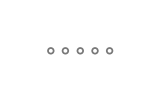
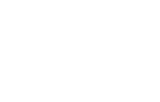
via: (50, 50) -> none
via: (65, 50) -> none
via: (80, 50) -> none
via: (95, 50) -> none
via: (109, 50) -> none

